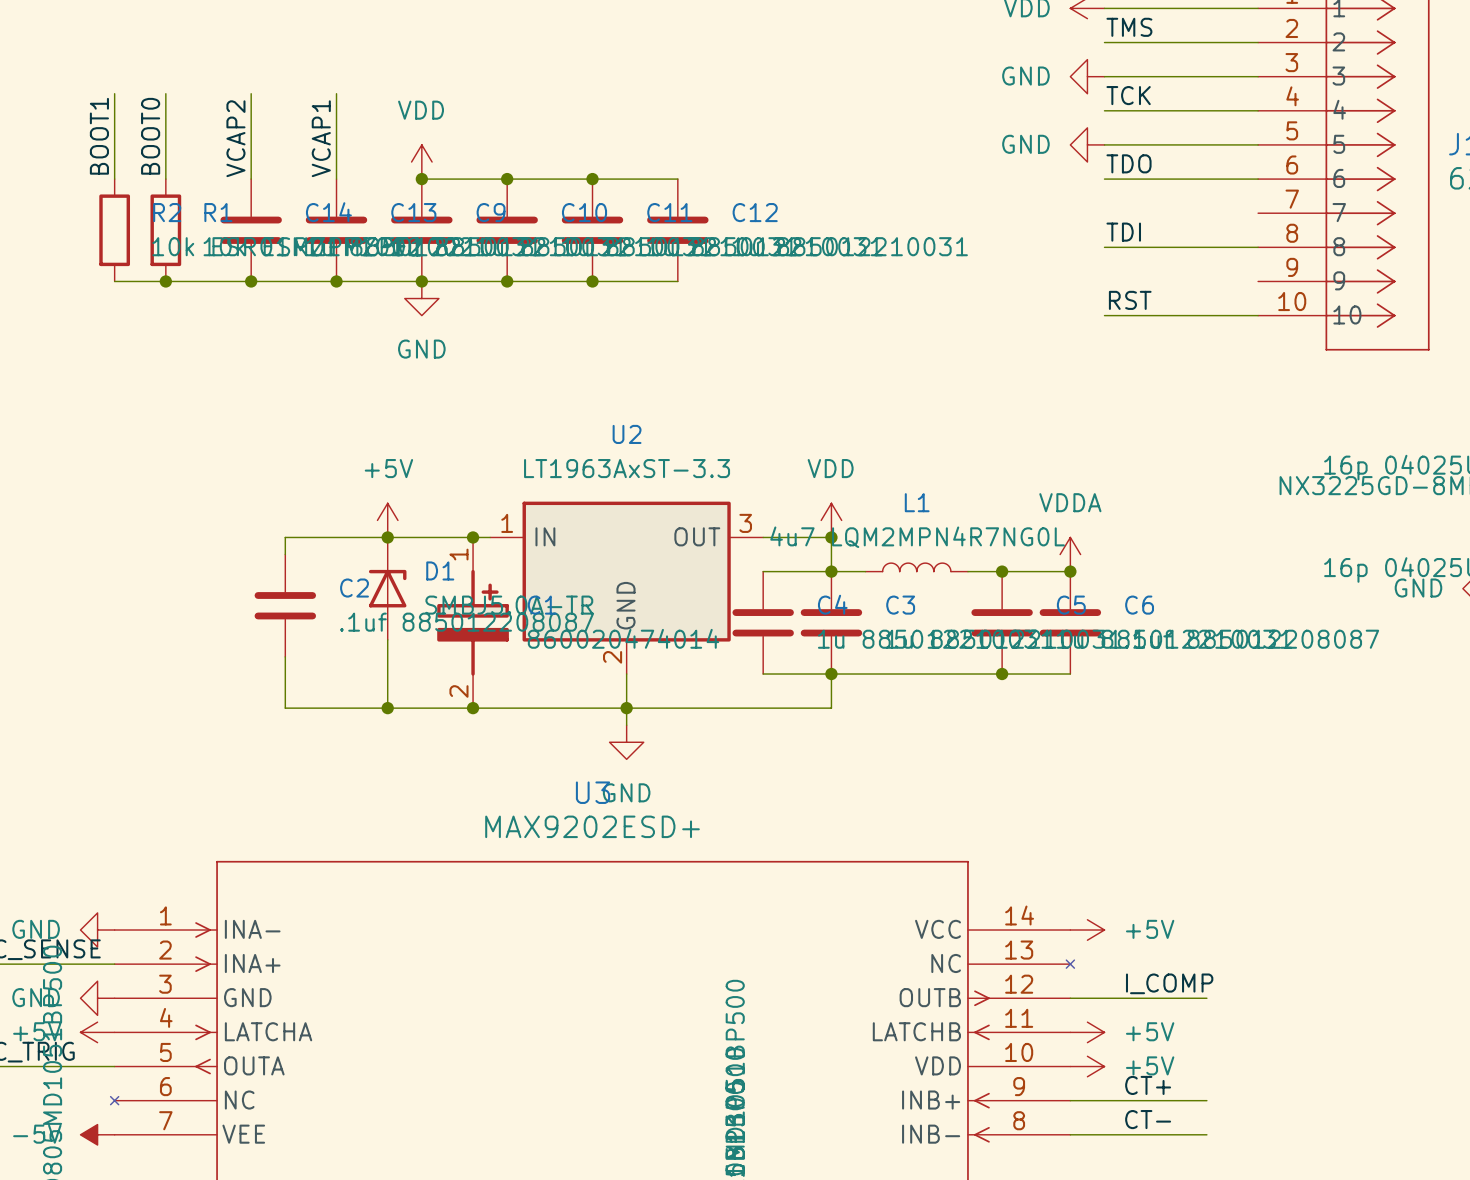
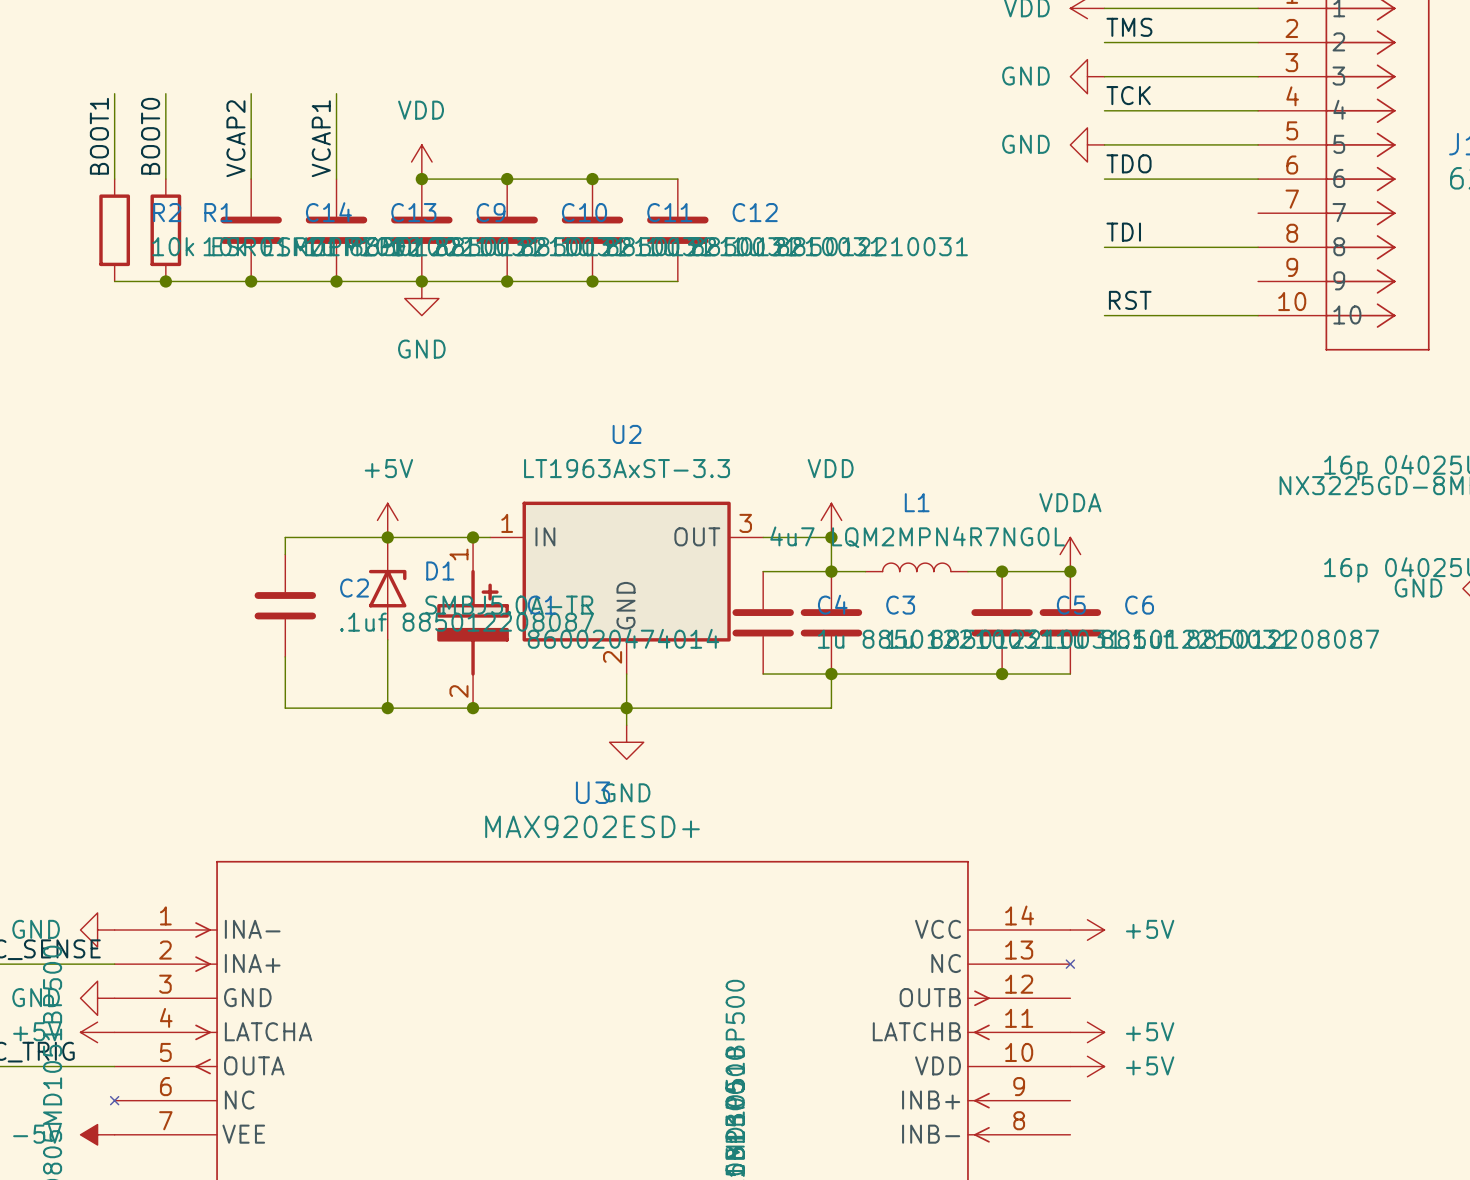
label: I_COMP (1169, 983) -> none
wire: (1070, 998) (1206, 998) -> none
label: CT+ (1148, 1085) -> none
wire: (1070, 1100) (1206, 1100) -> none
label: CT- (1148, 1119) -> none
wire: (1070, 1134) (1206, 1134) -> none

